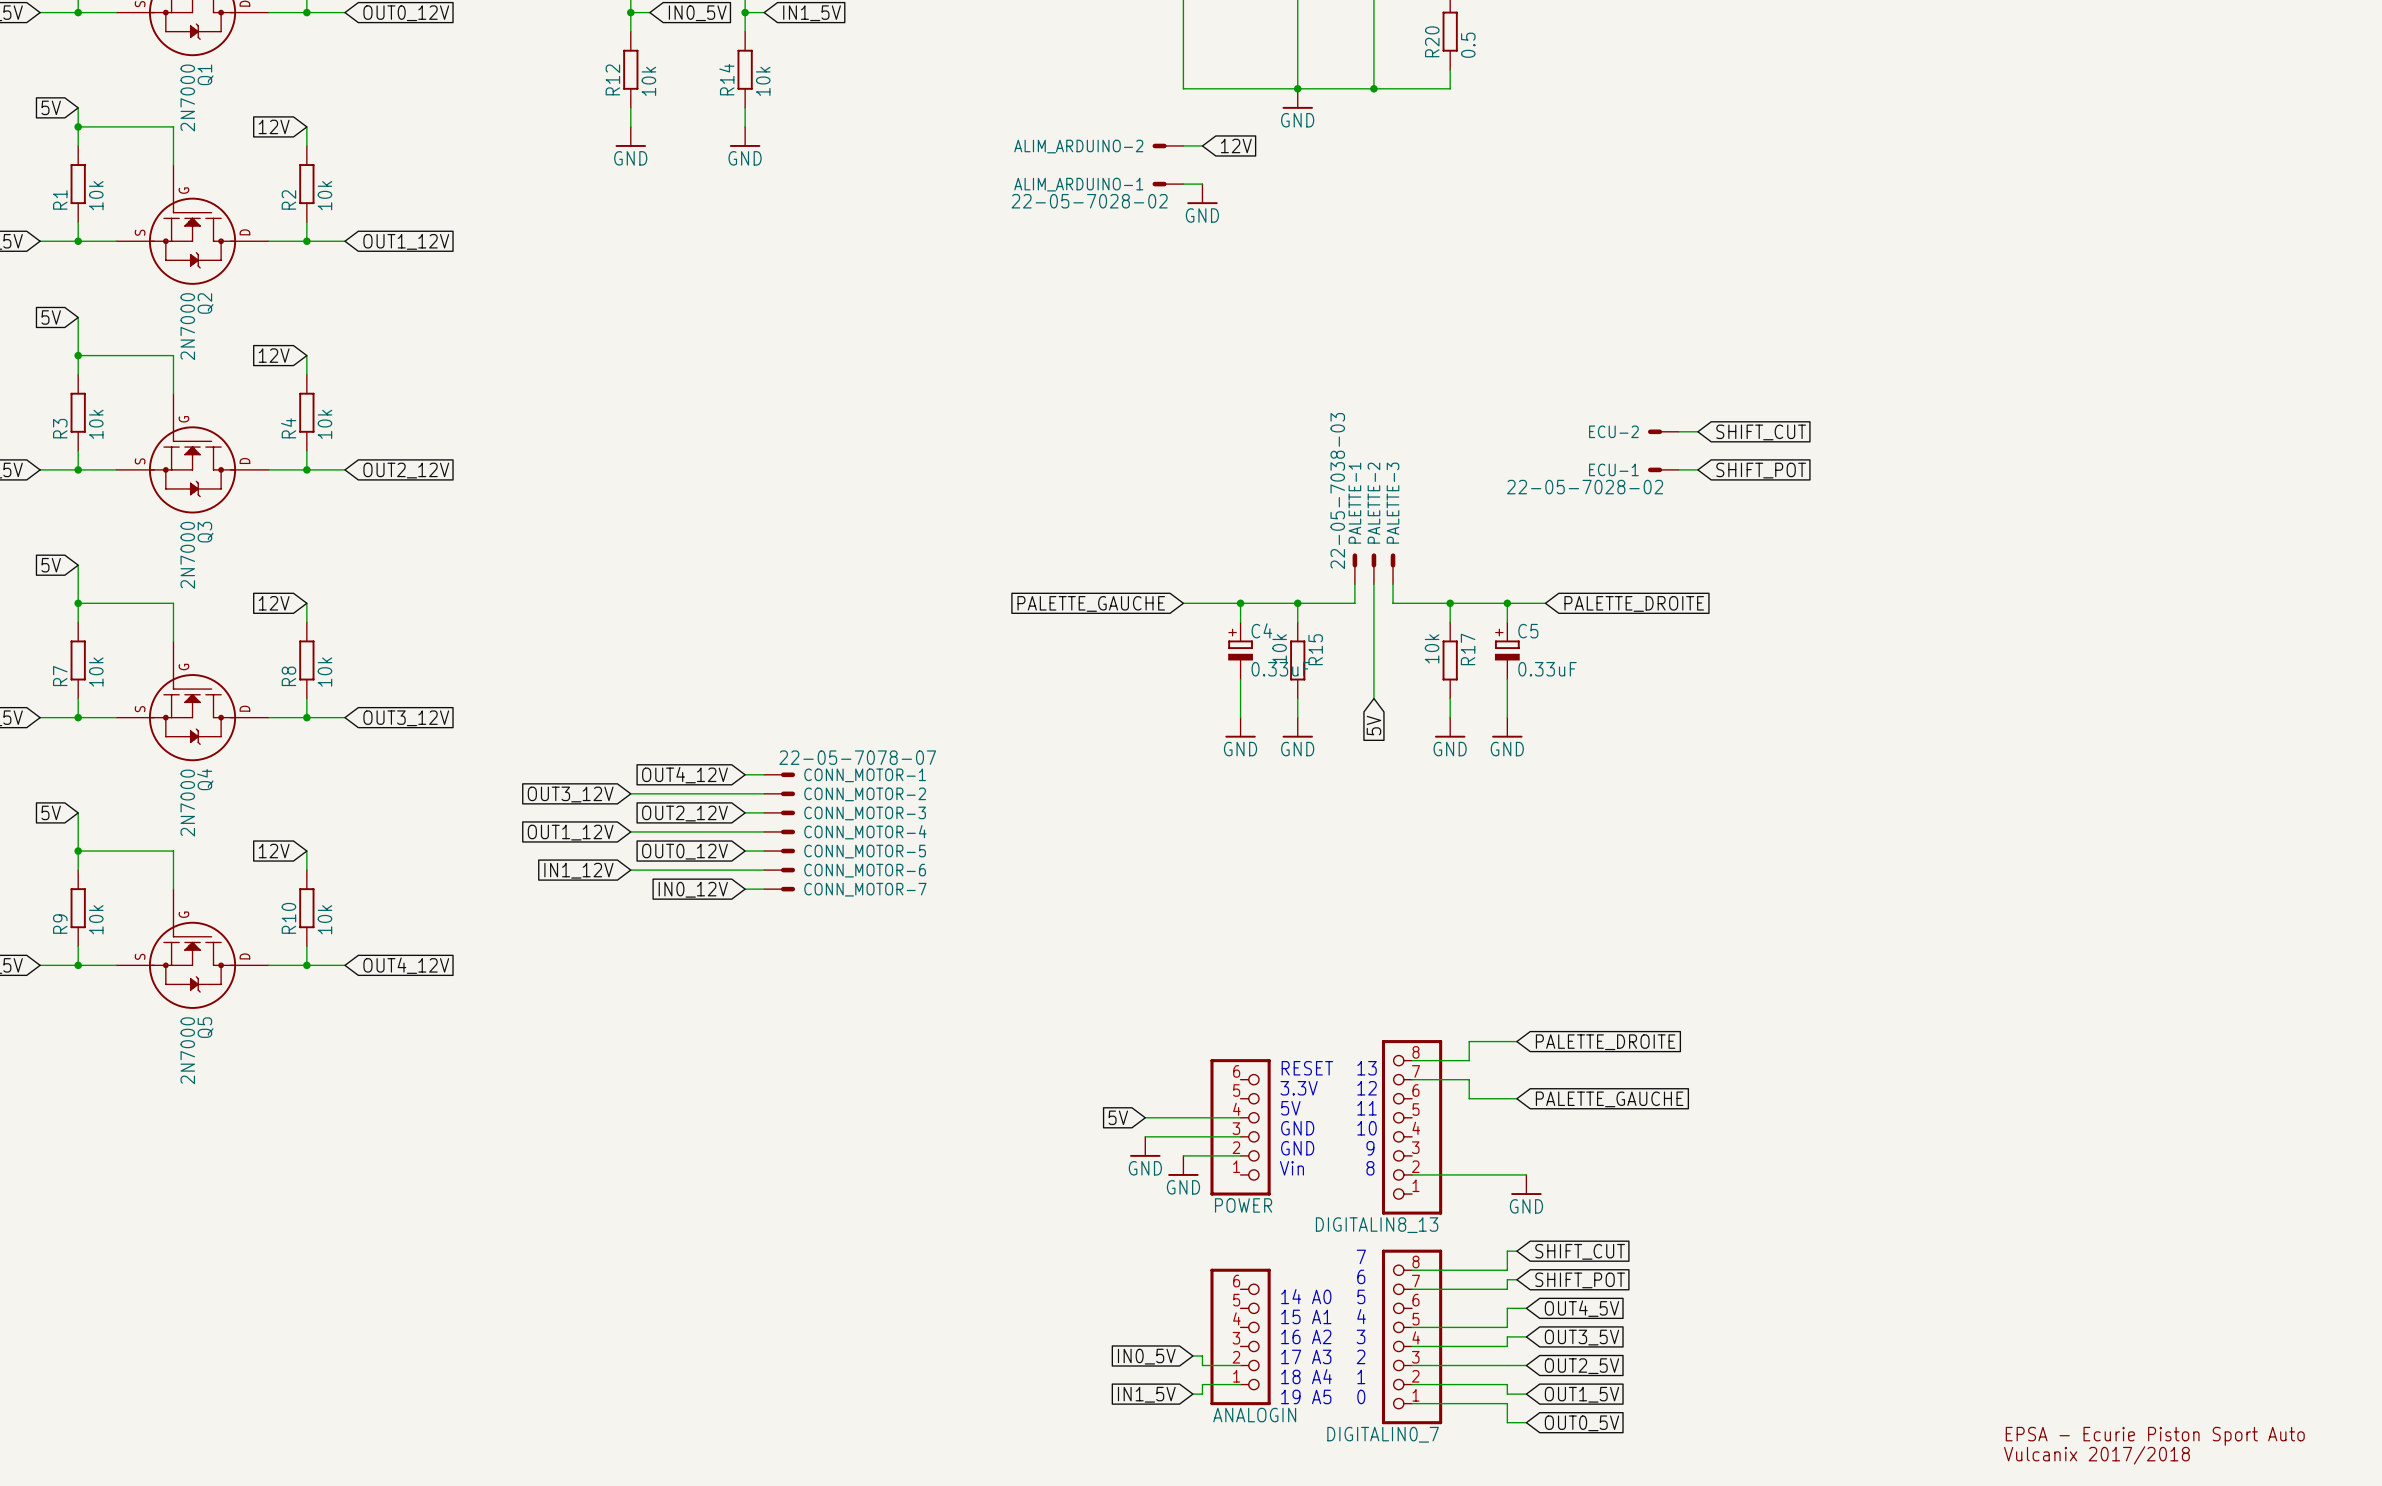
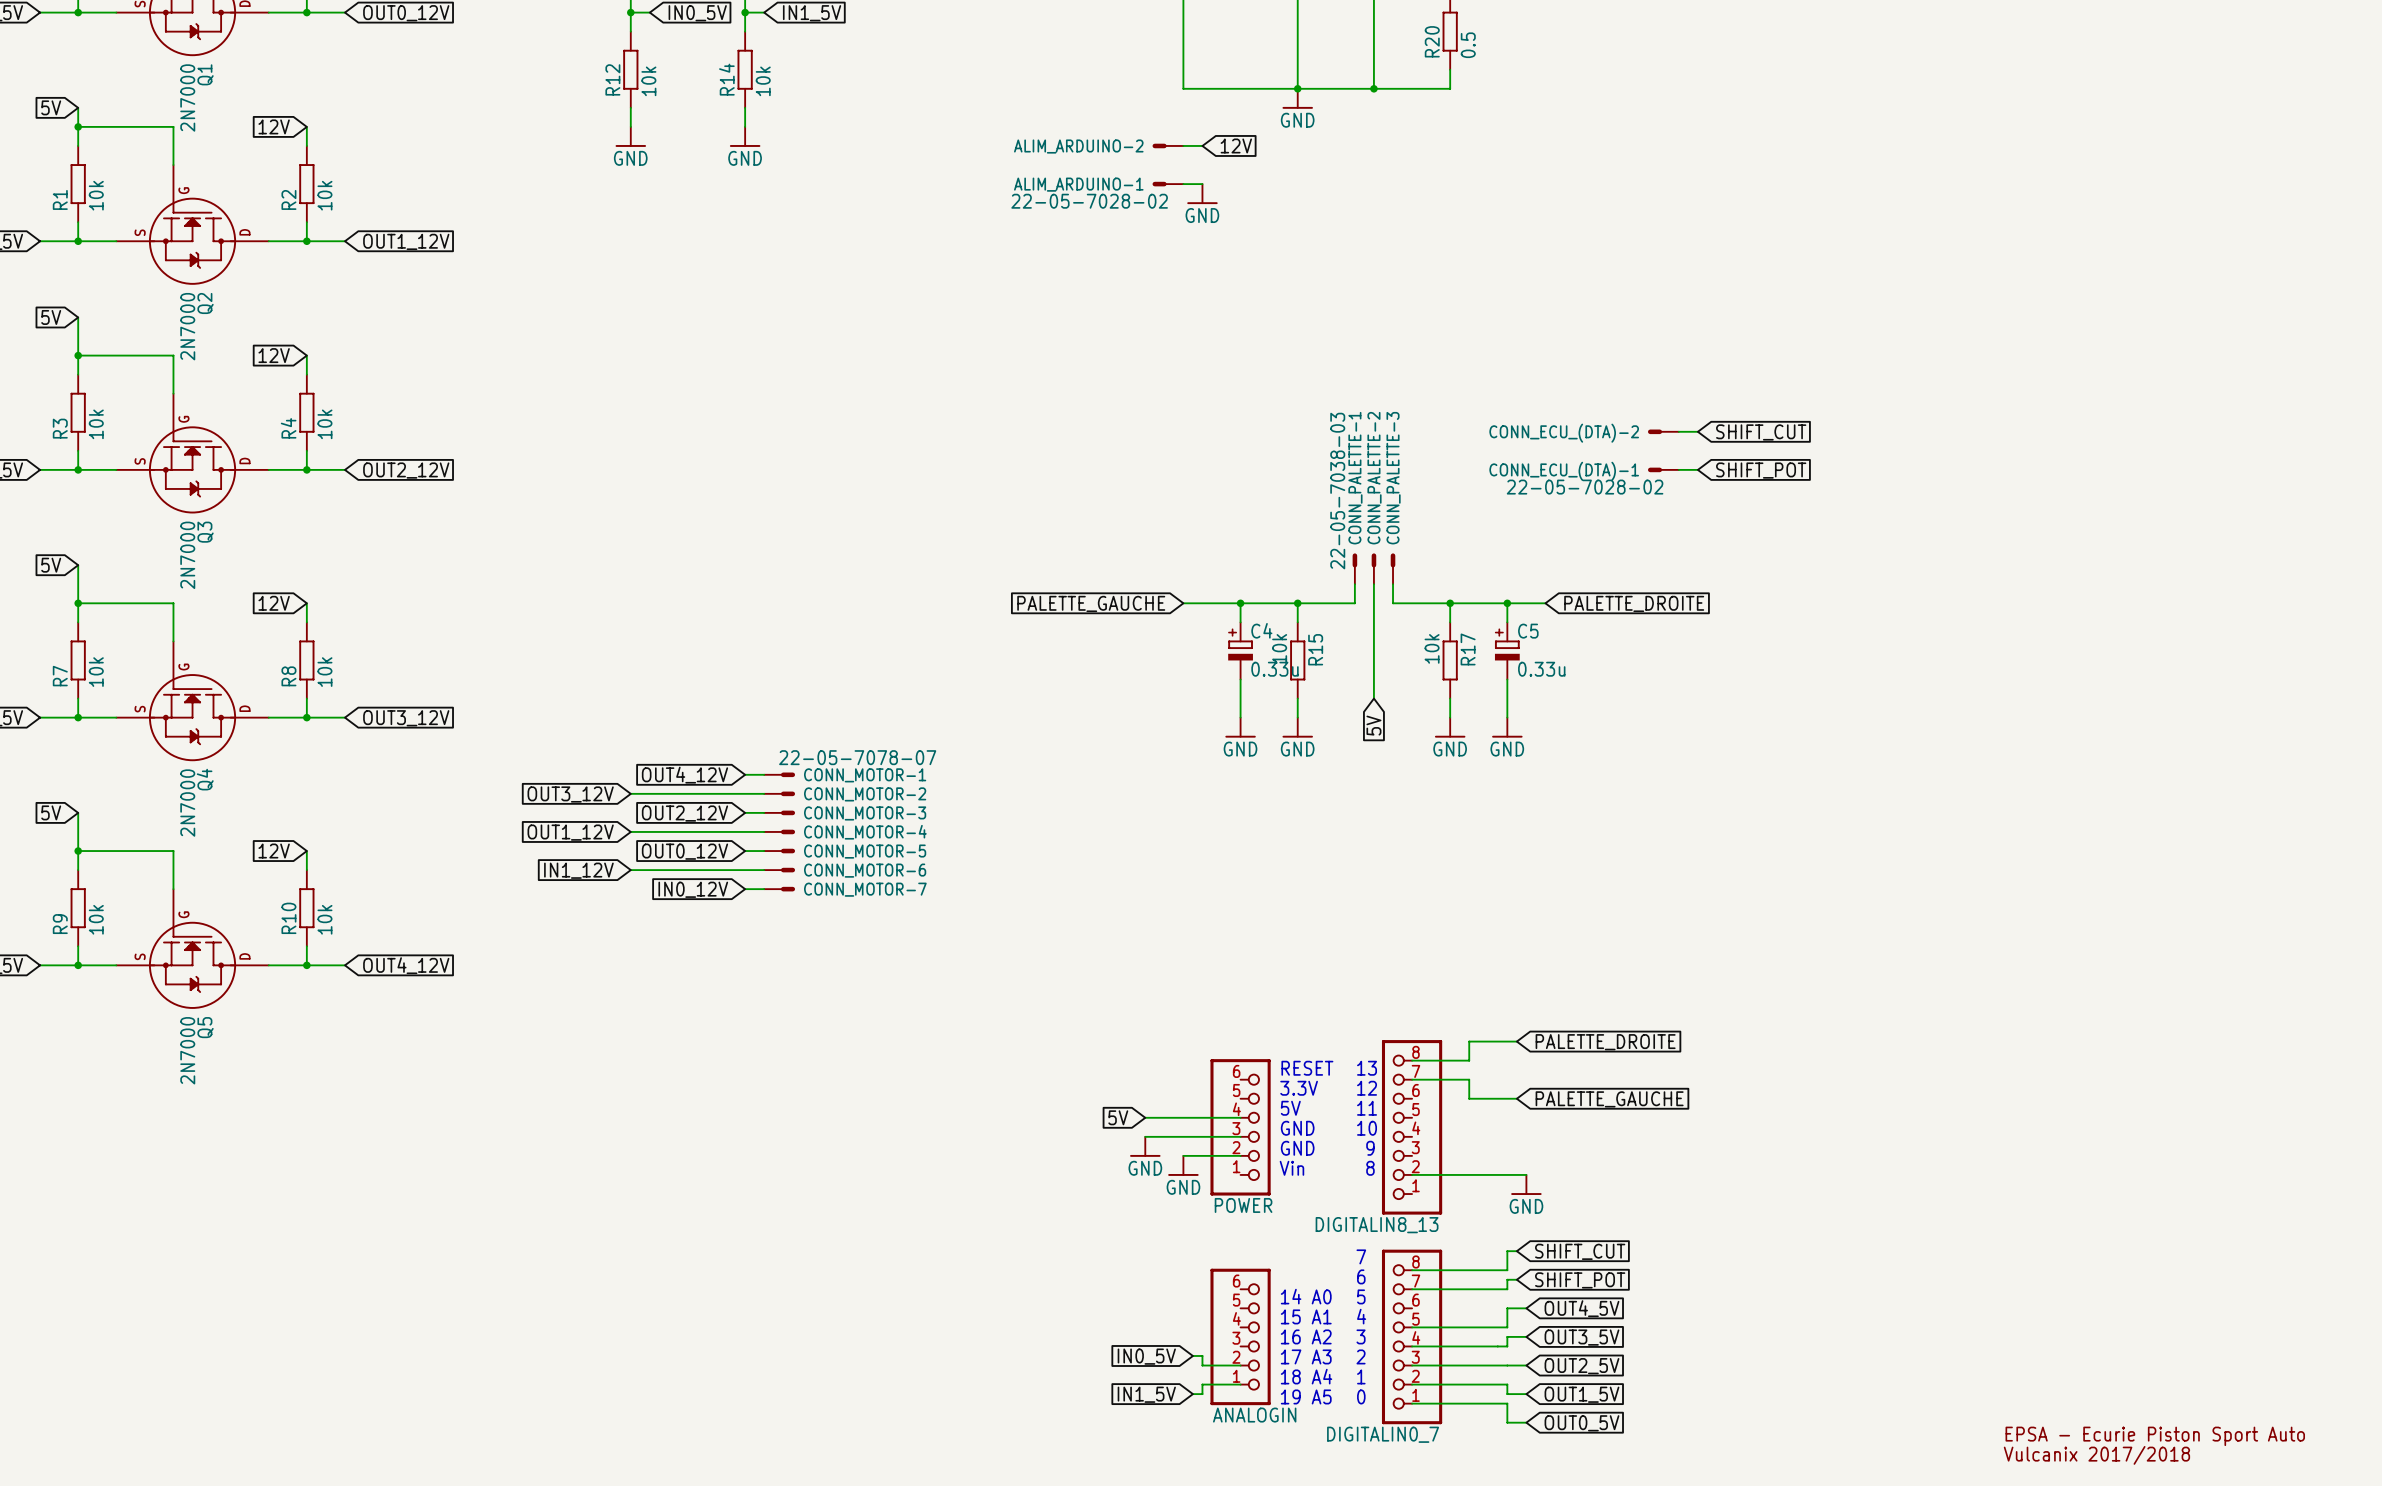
ECU-2 name: ECU-2 (1613, 431) -> CONN_ECU_(DTA)-2 (1564, 433)
ECU-1 name: ECU-1 (1613, 469) -> CONN_ECU_(DTA)-1 (1564, 471)
PALETTE-1 name: PALETTE-1 (1354, 503) -> CONN_PALETTE-1 (1355, 478)
PALETTE-2 name: PALETTE-2 (1373, 503) -> CONN_PALETTE-2 (1374, 478)
PALETTE-3 name: PALETTE-3 (1393, 503) -> CONN_PALETTE-3 (1393, 478)
C4 value: 0.33uF (1280, 669) -> 0.33u (1275, 669)
C5 value: 0.33uF (1547, 669) -> 0.33u (1541, 669)

